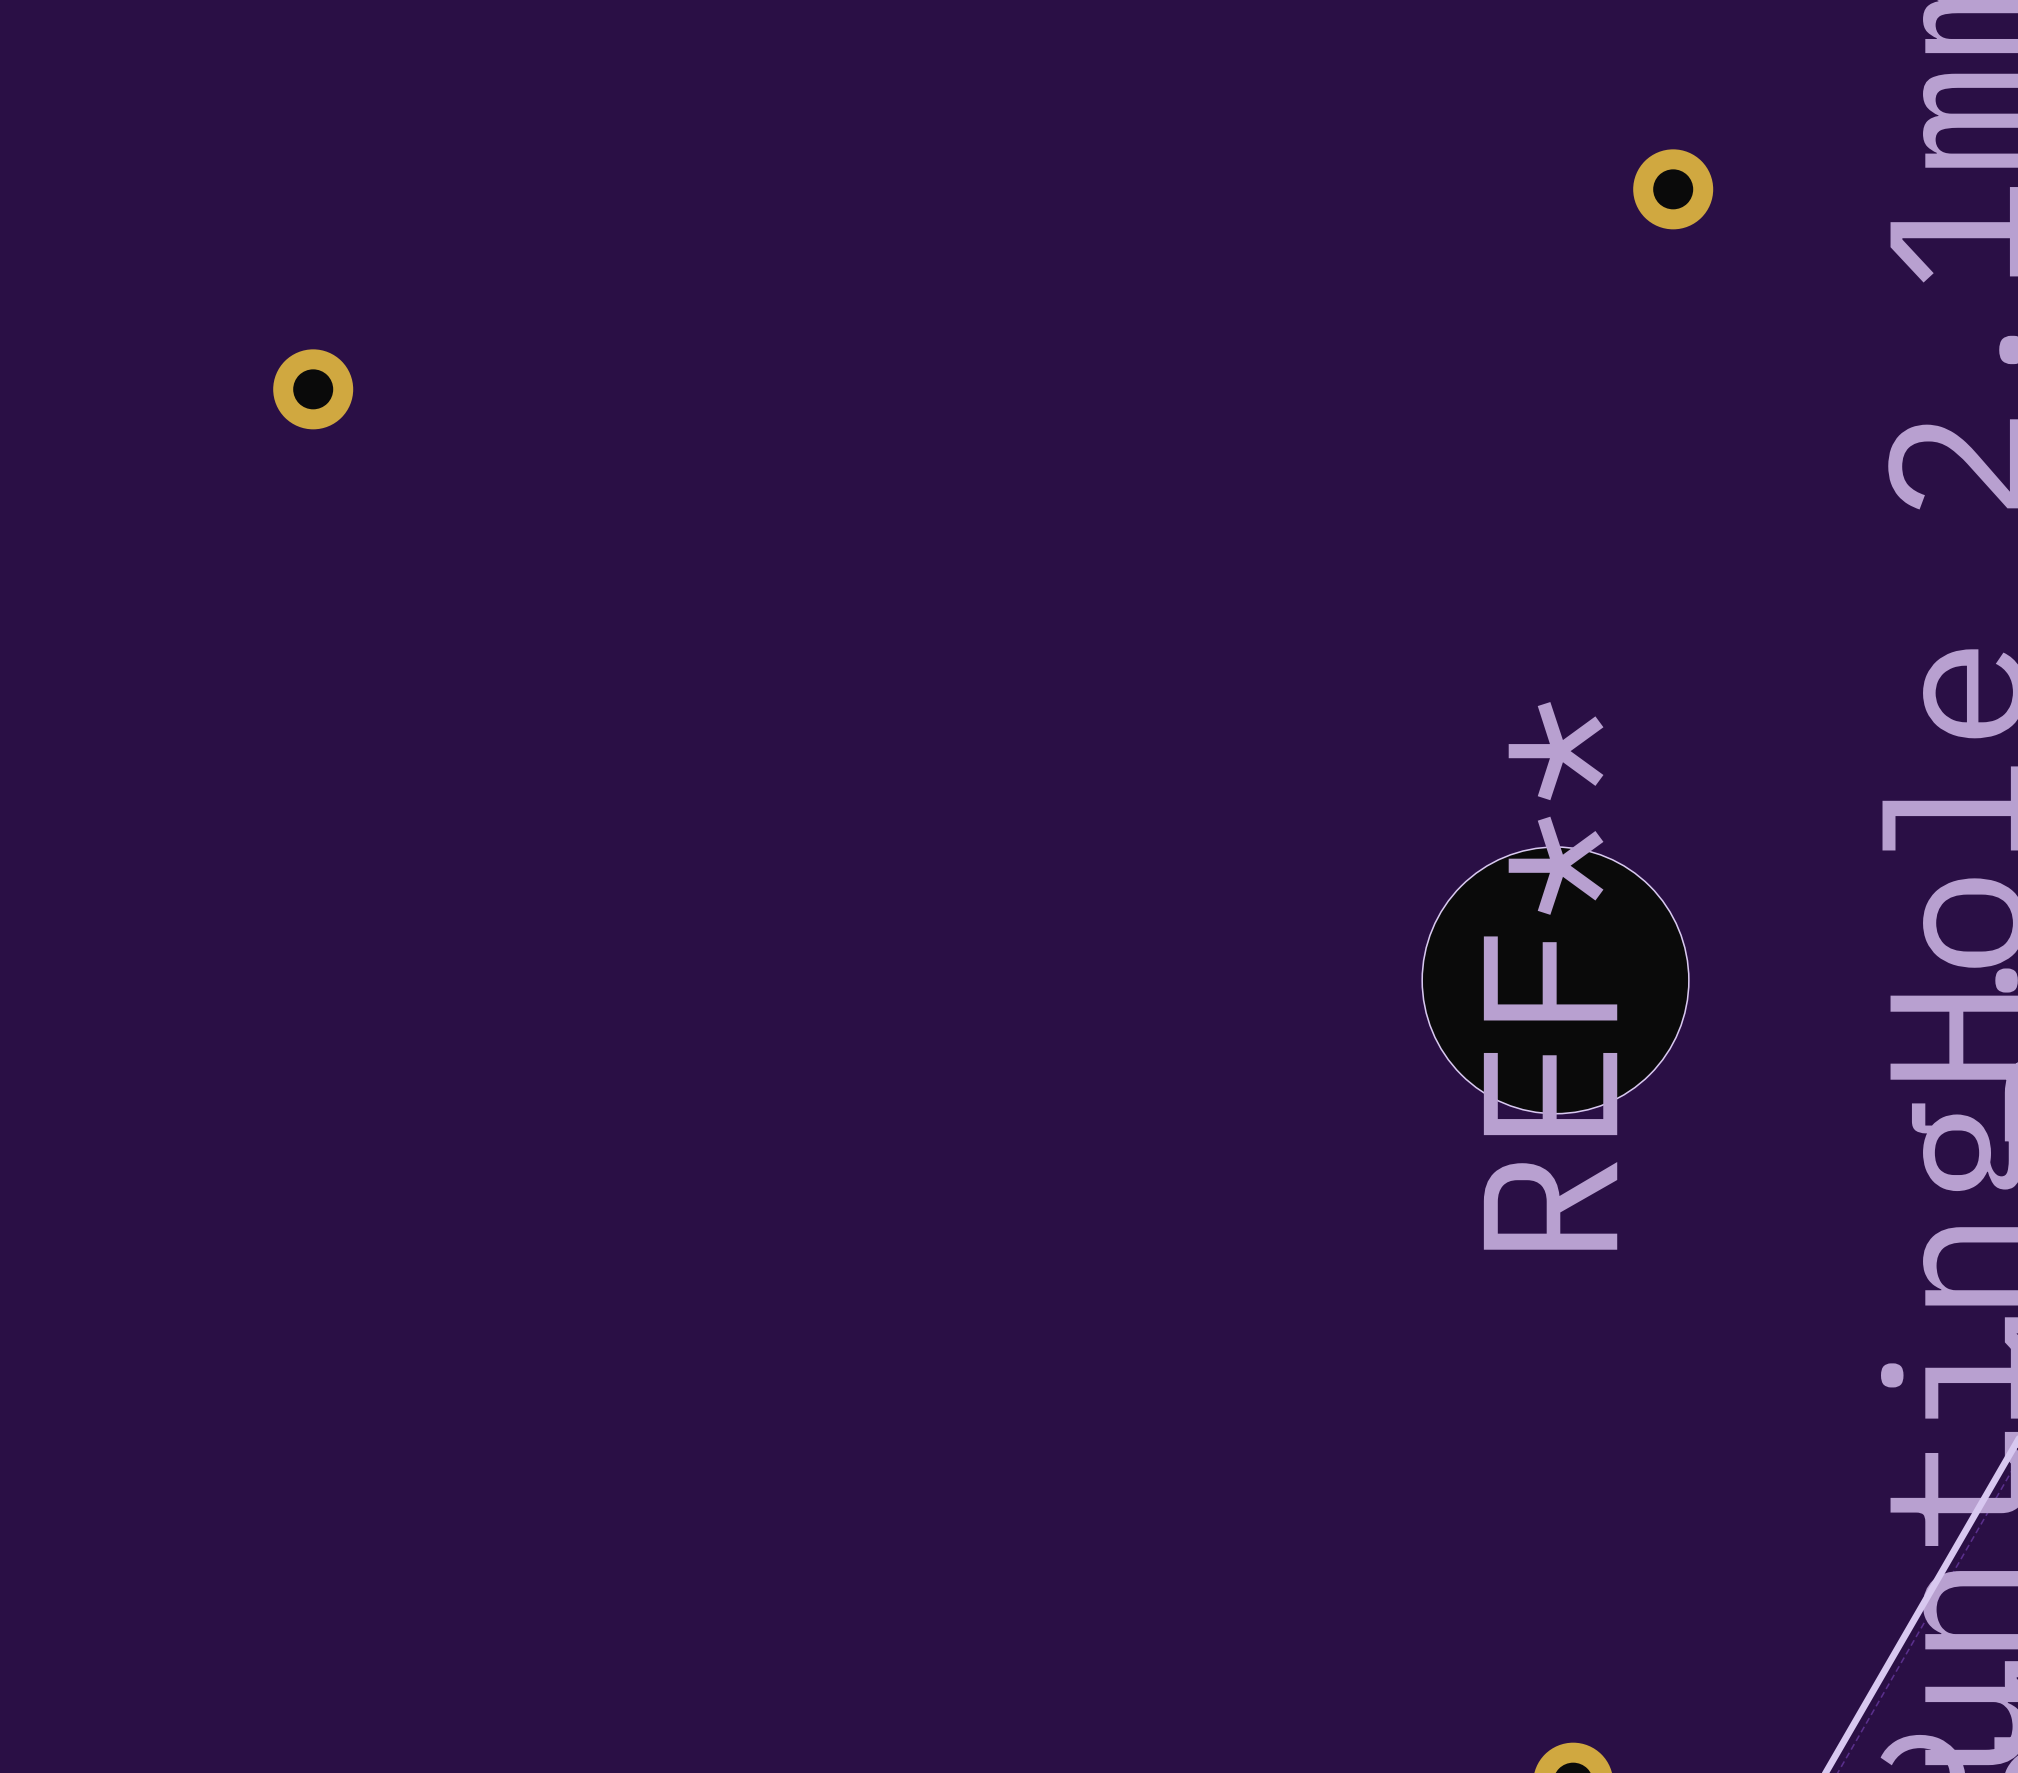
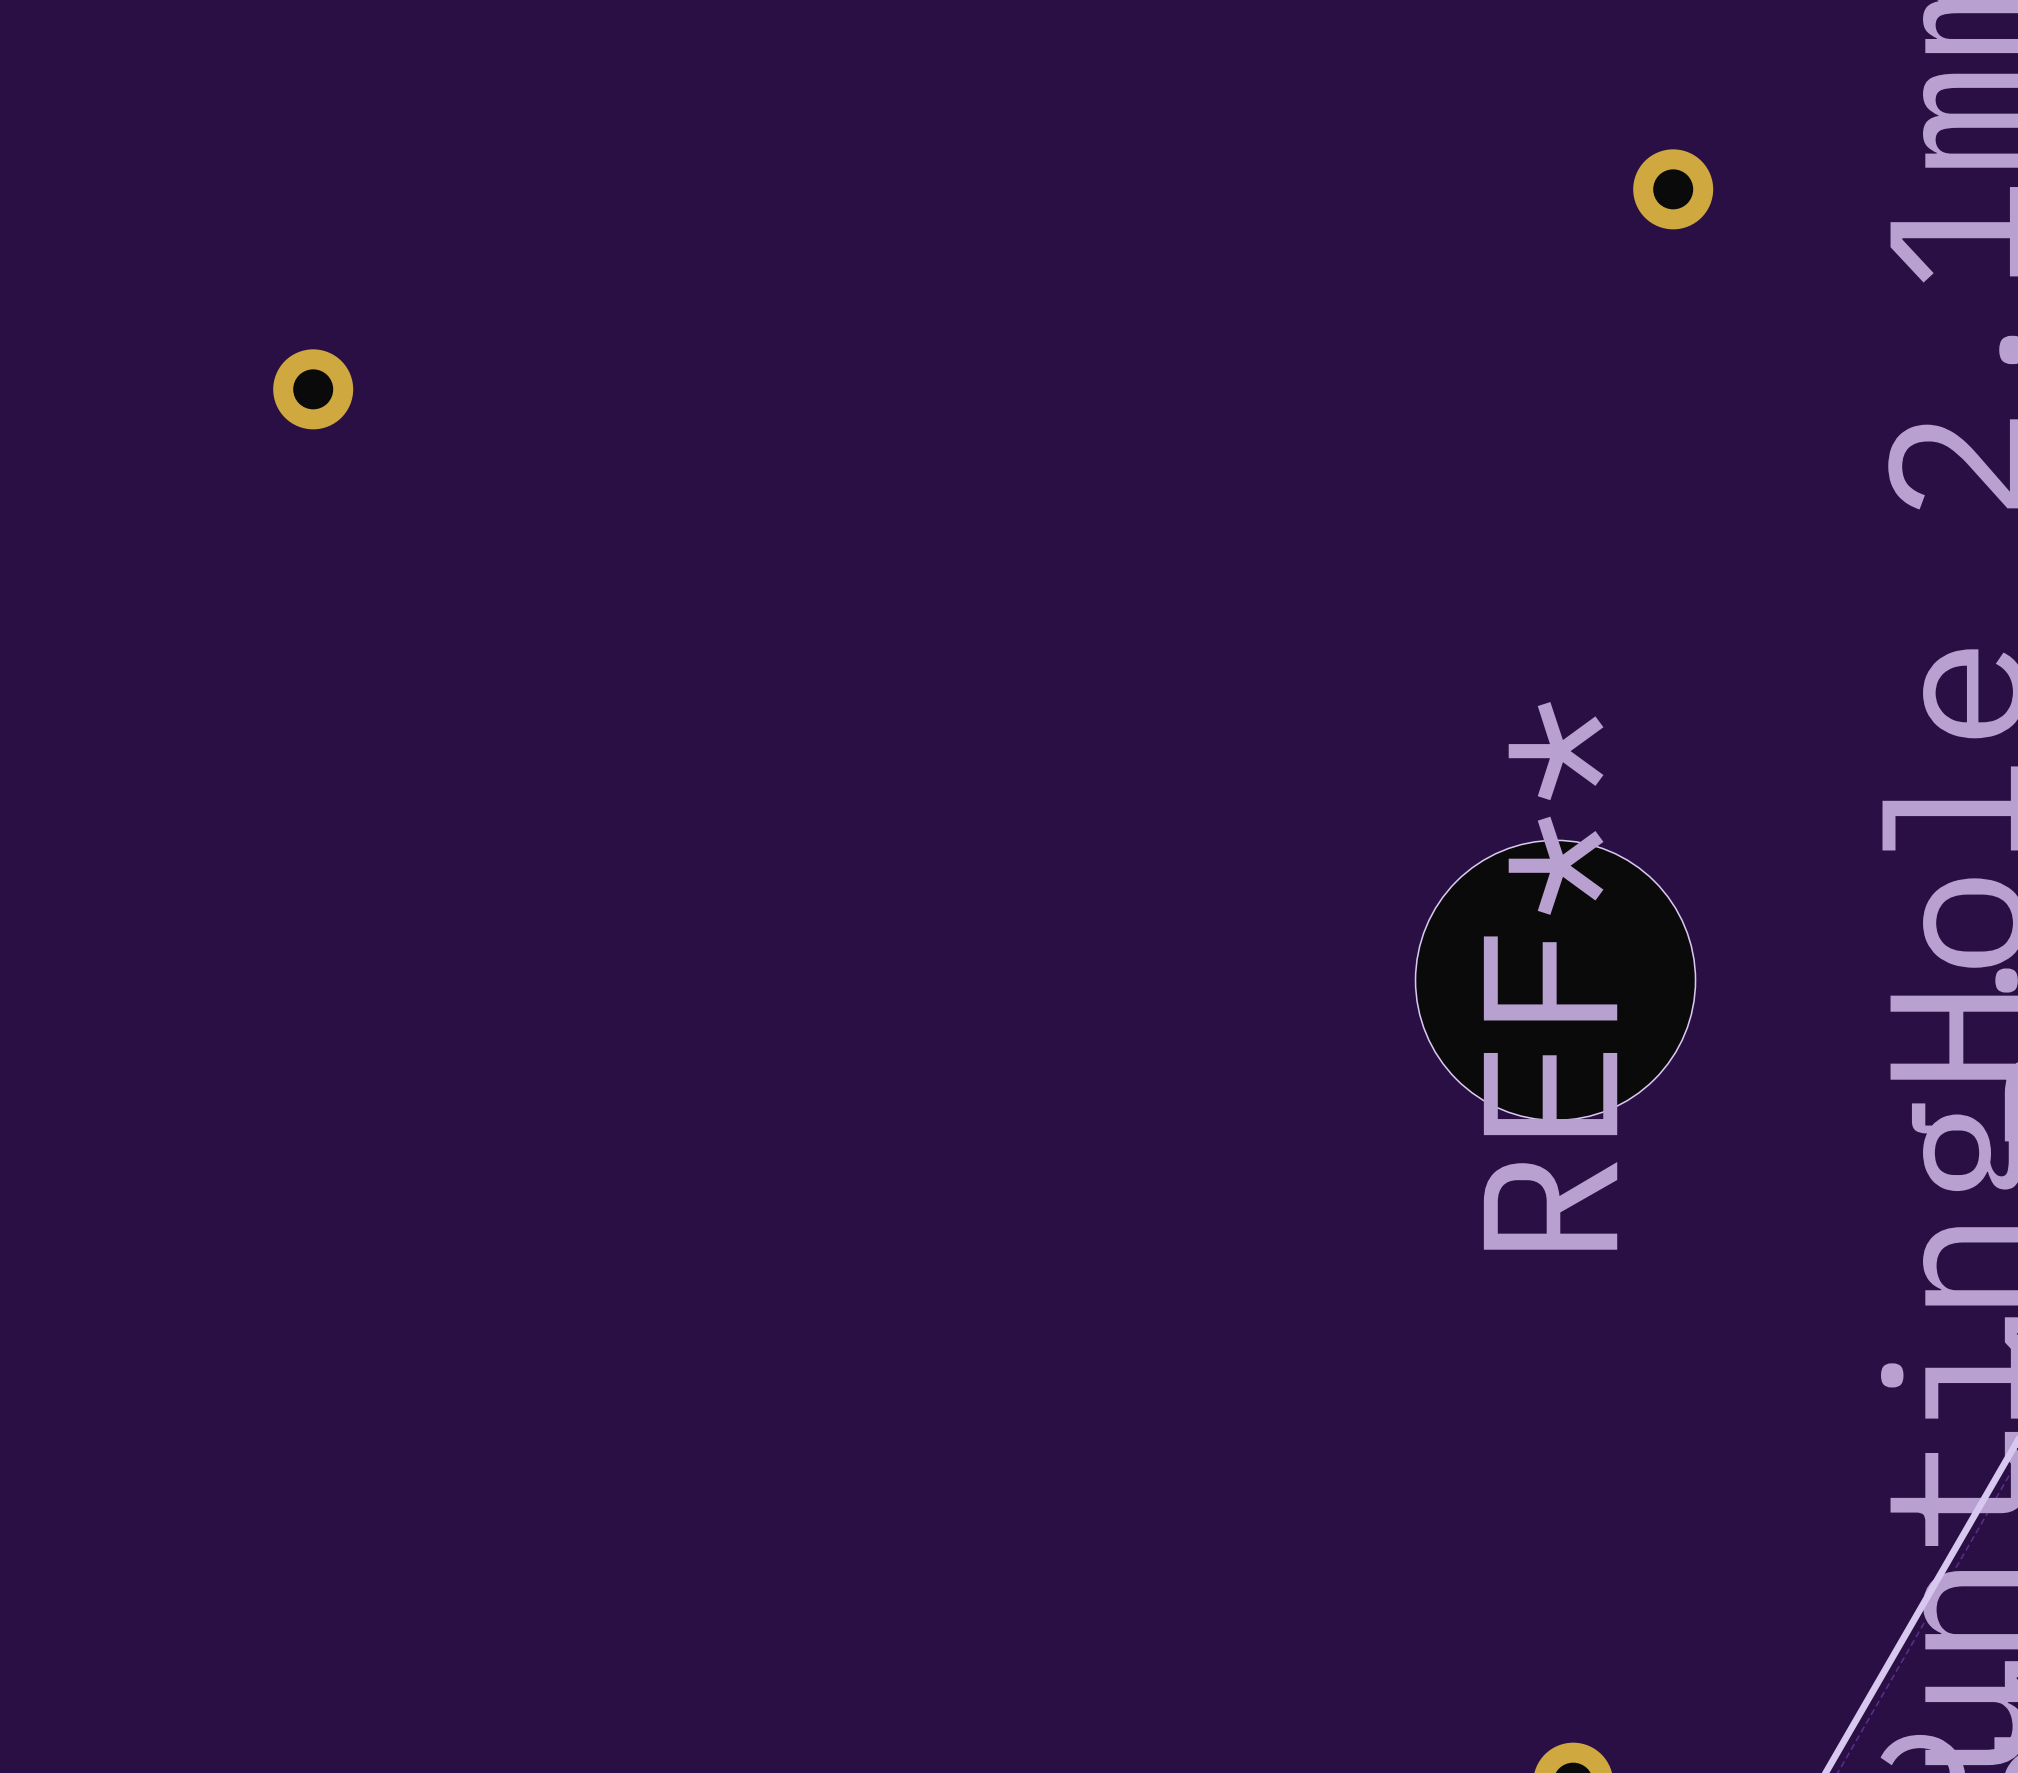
REF** footprint: [1422, 847, 1689, 1114] -> [1415, 840, 1696, 1121]

